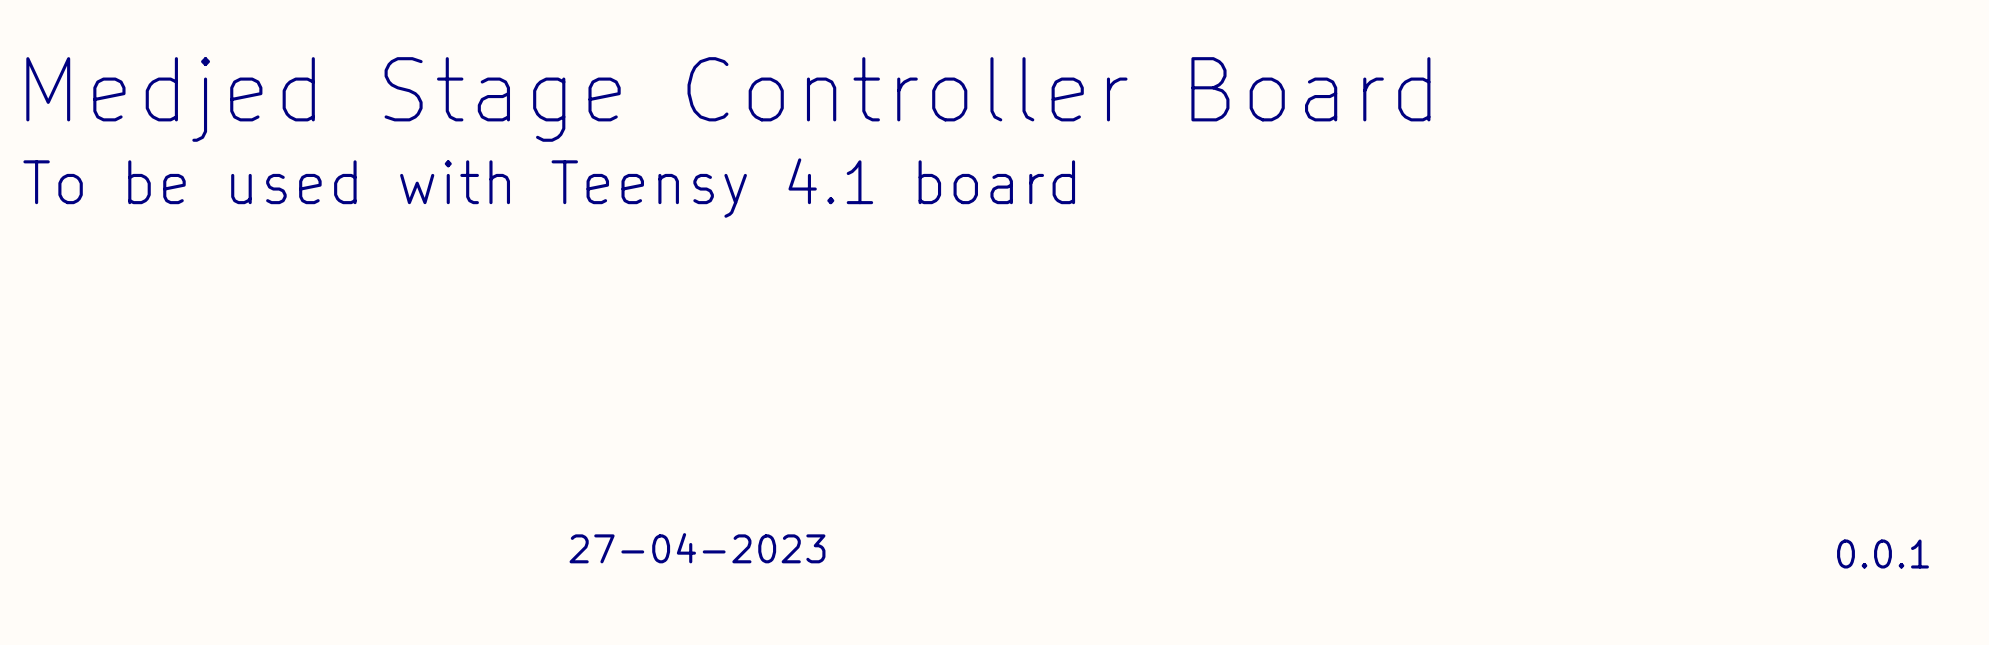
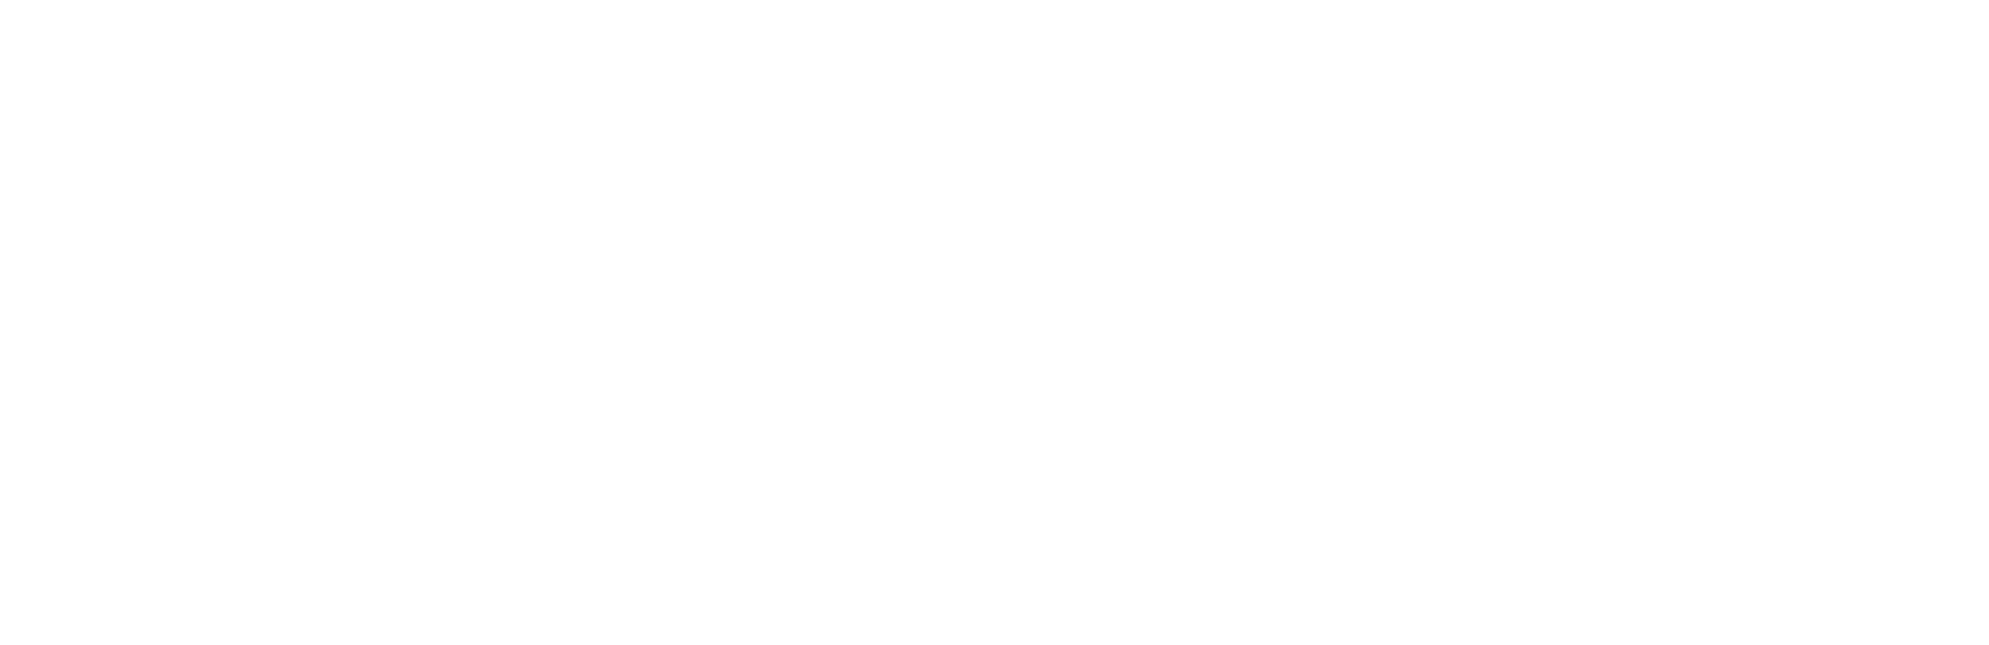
text: Medjed Stage Controller Board (728, 99) -> none
text: To be used with Teensy 4.1 board (549, 188) -> none
text: 27-04-2023 (697, 548) -> none
text: 0.0.1 (1882, 554) -> none

